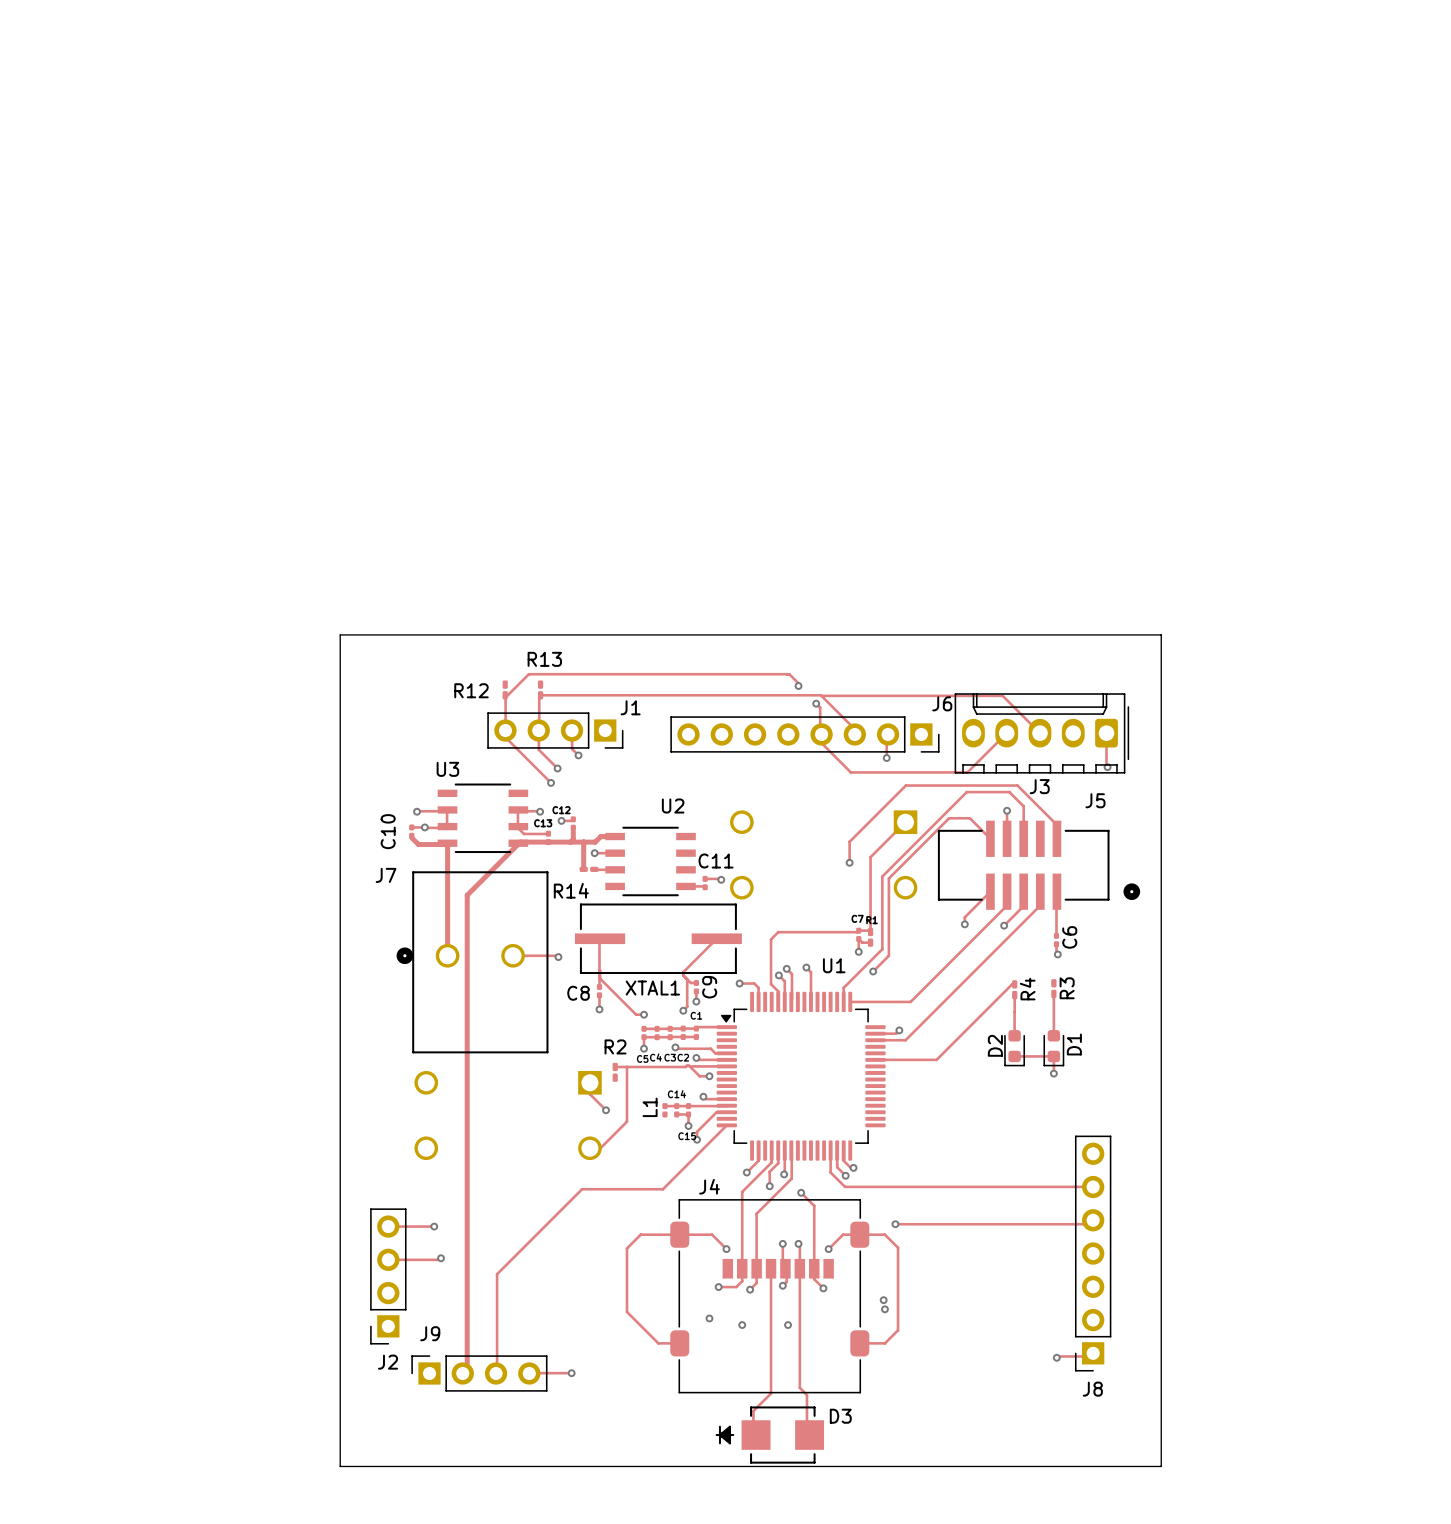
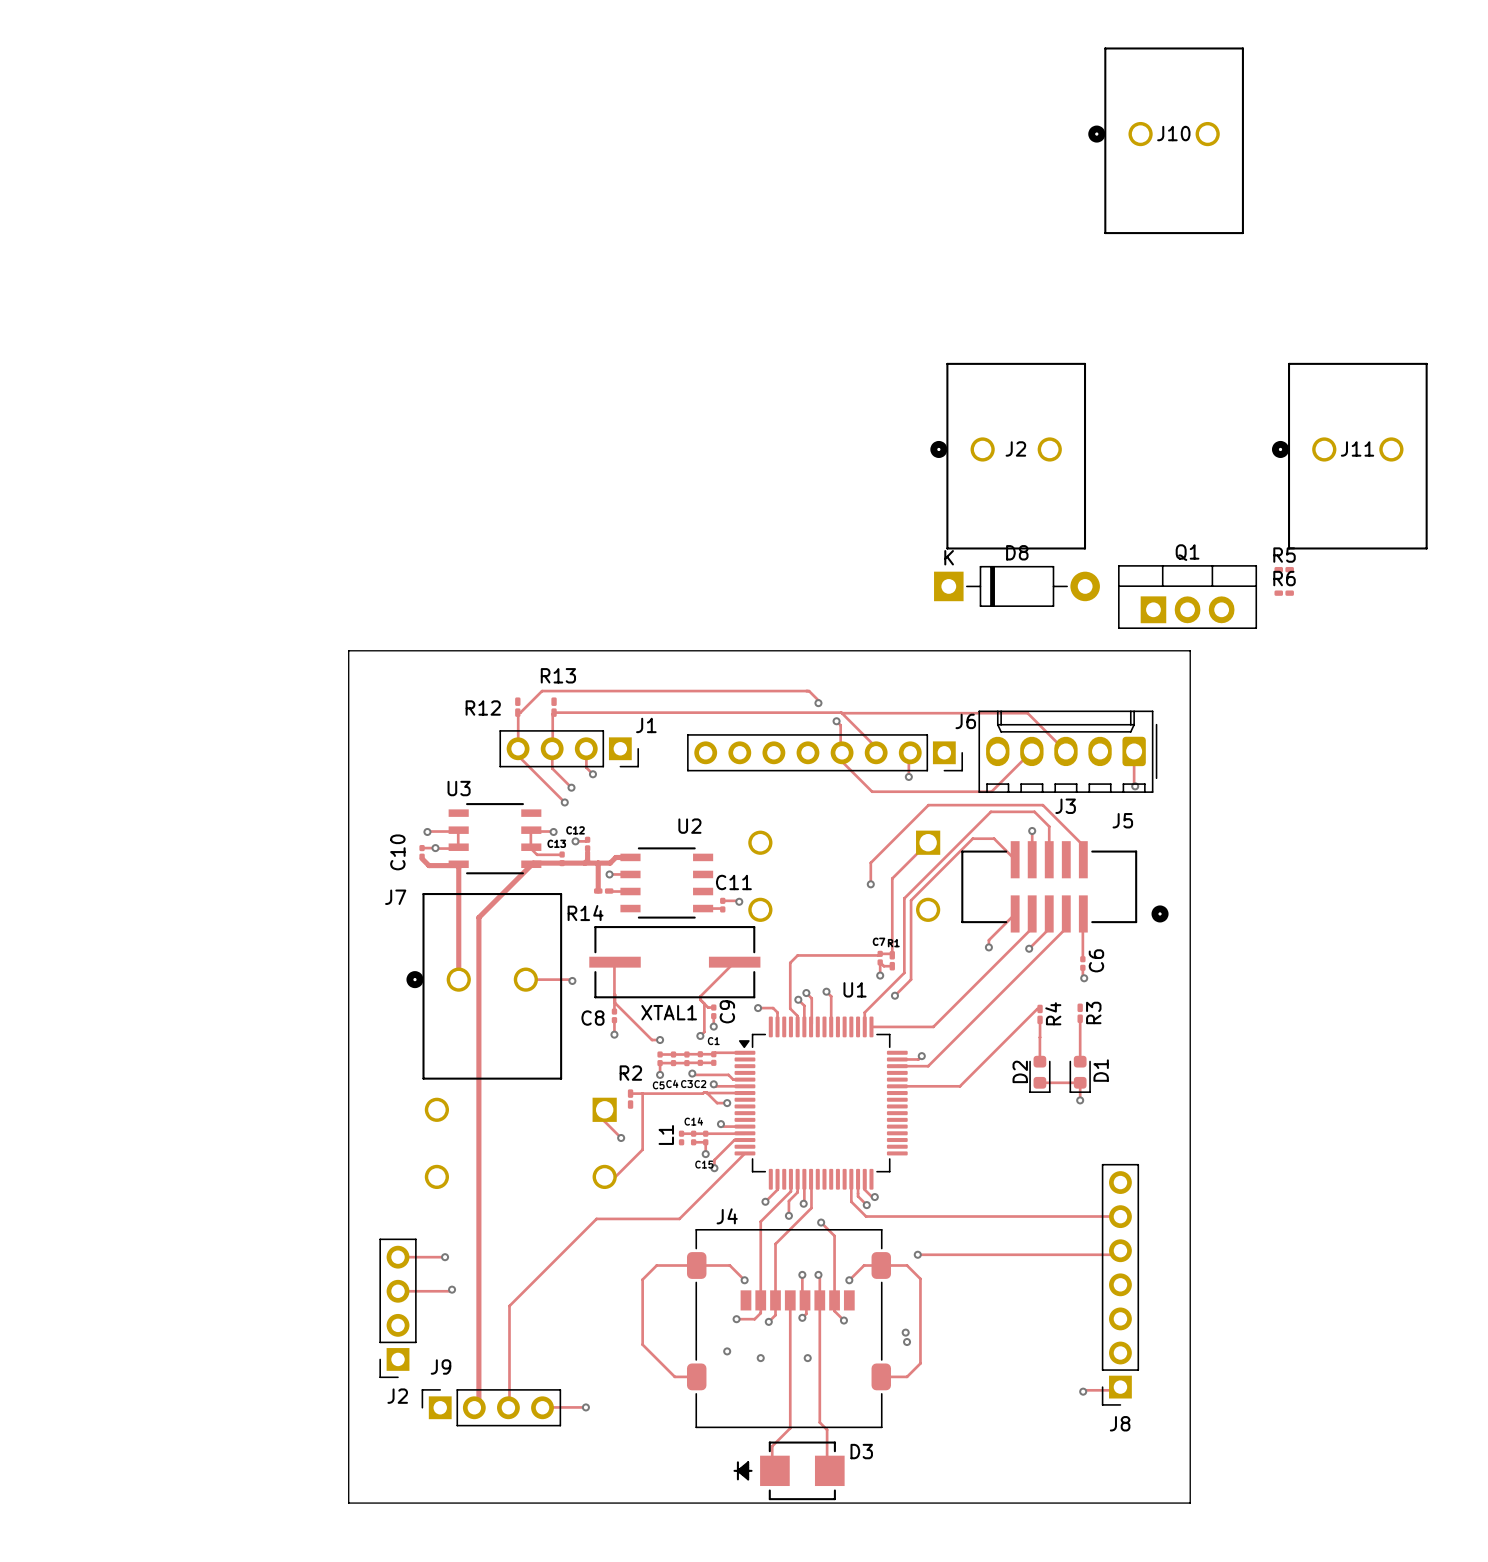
J10: none -> (1166, 140)
J2: none -> (1008, 456)
J11: none -> (1349, 456)
R5: none -> (1284, 569)
D8: none -> (1016, 586)
R6: none -> (1284, 593)
Q1: none -> (1187, 597)

